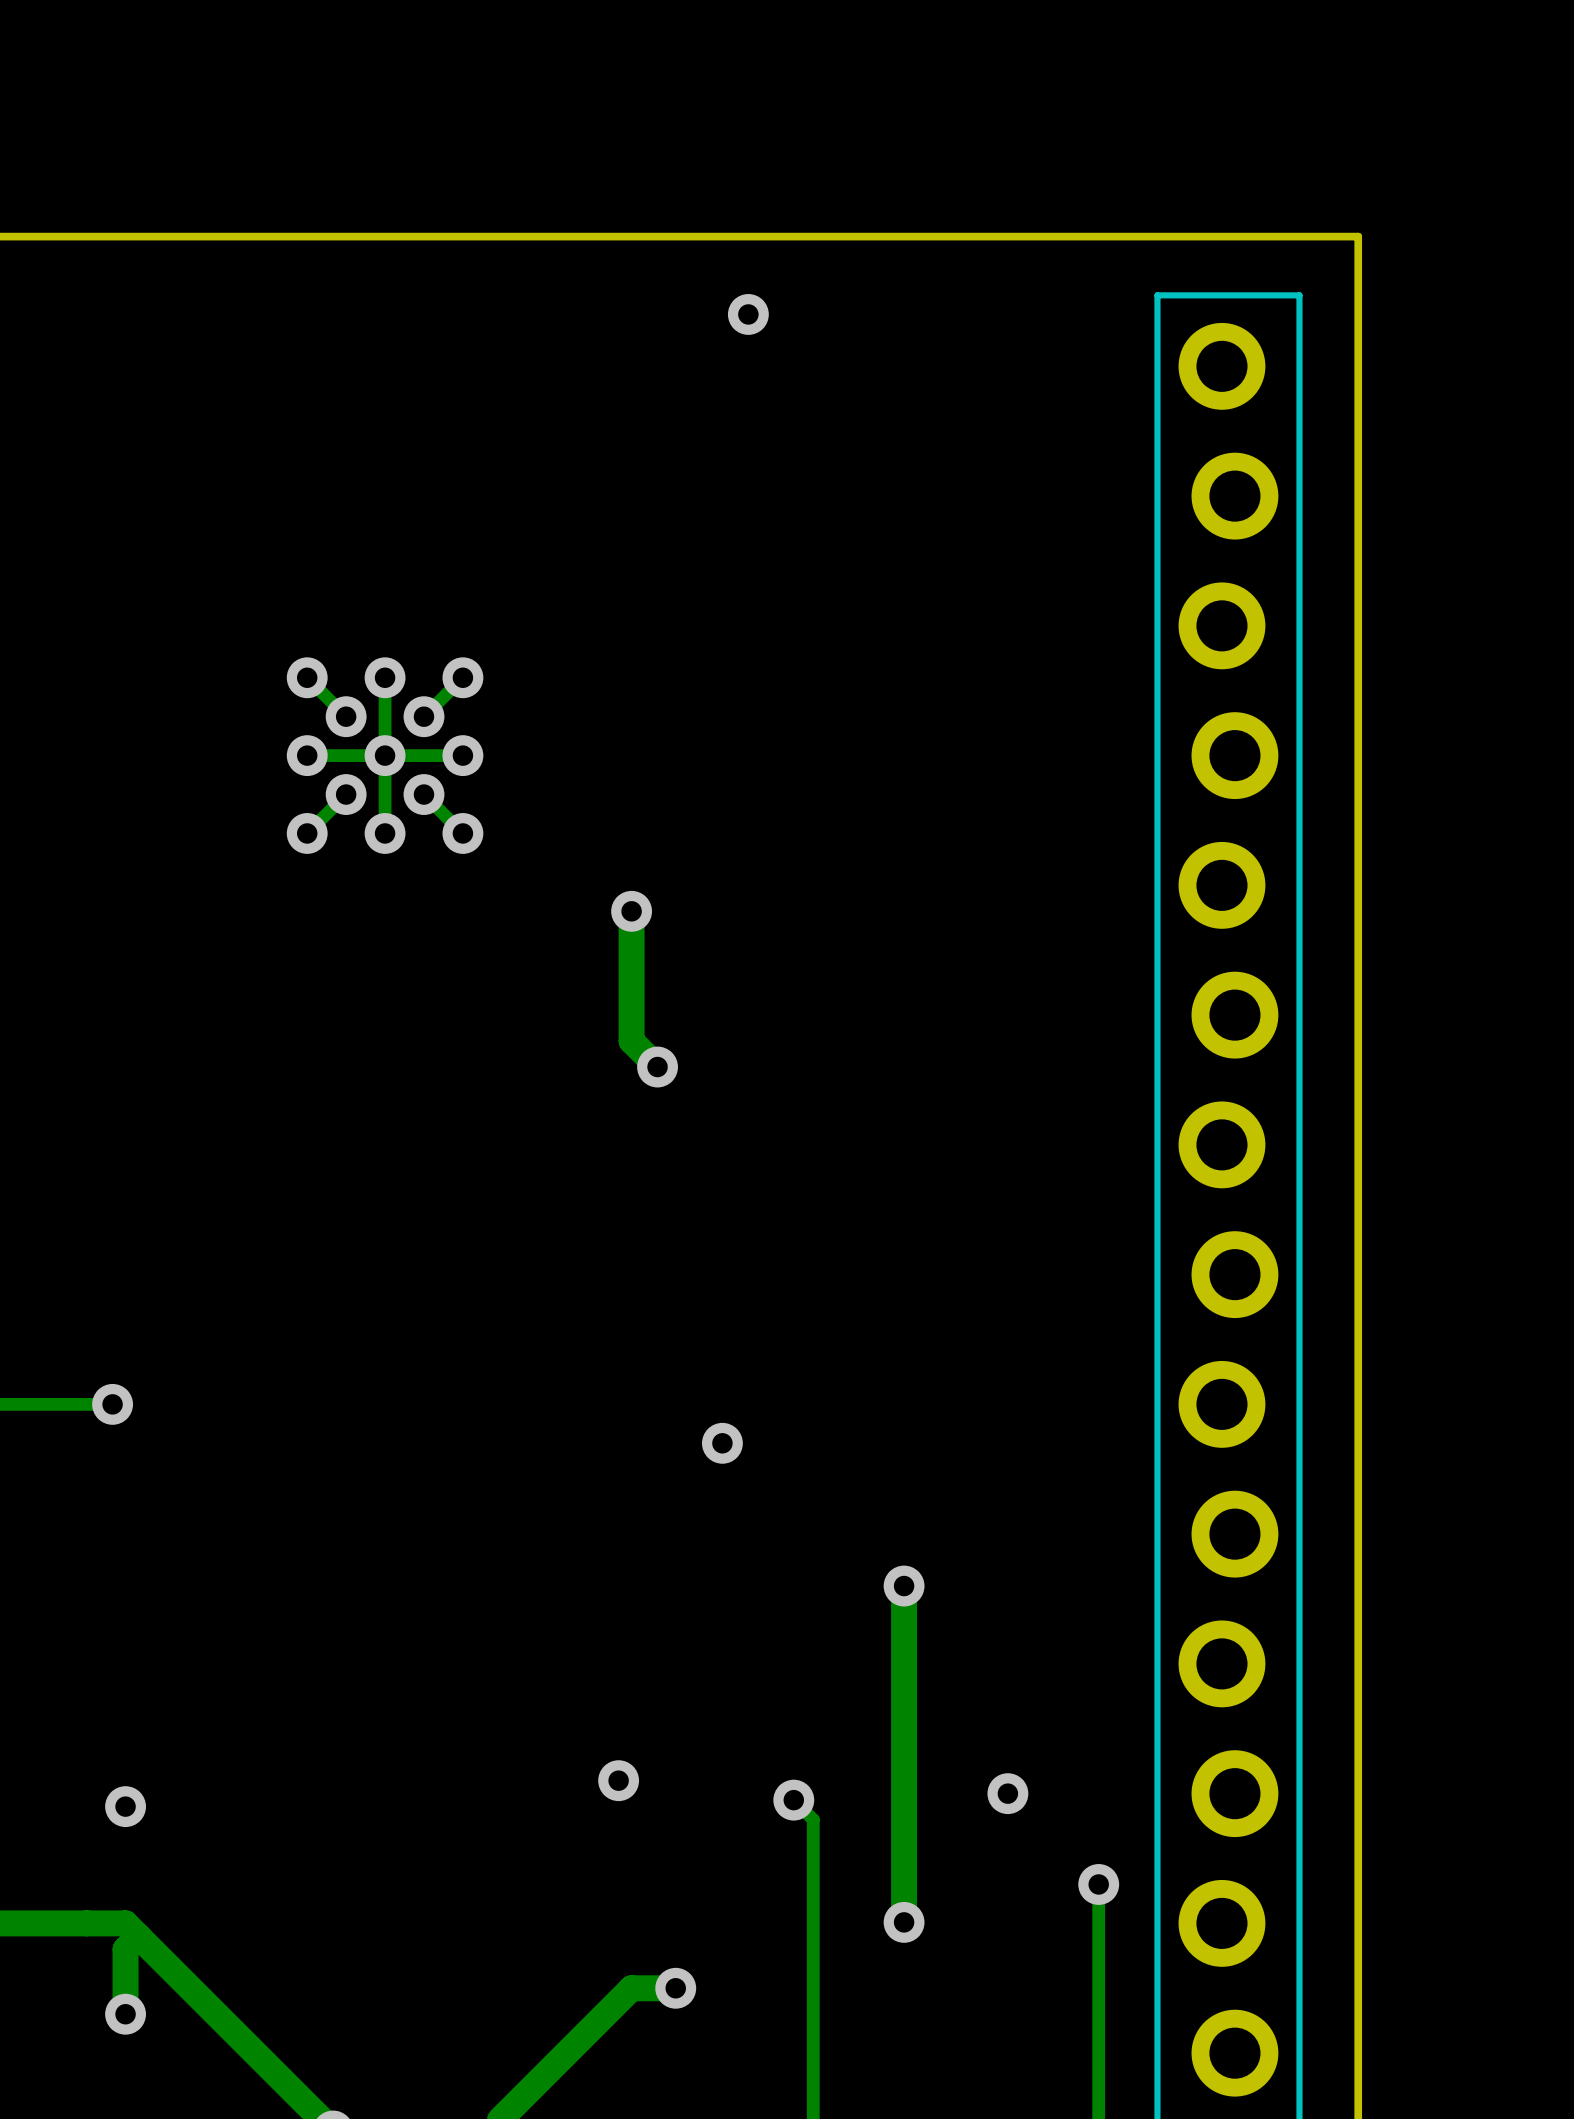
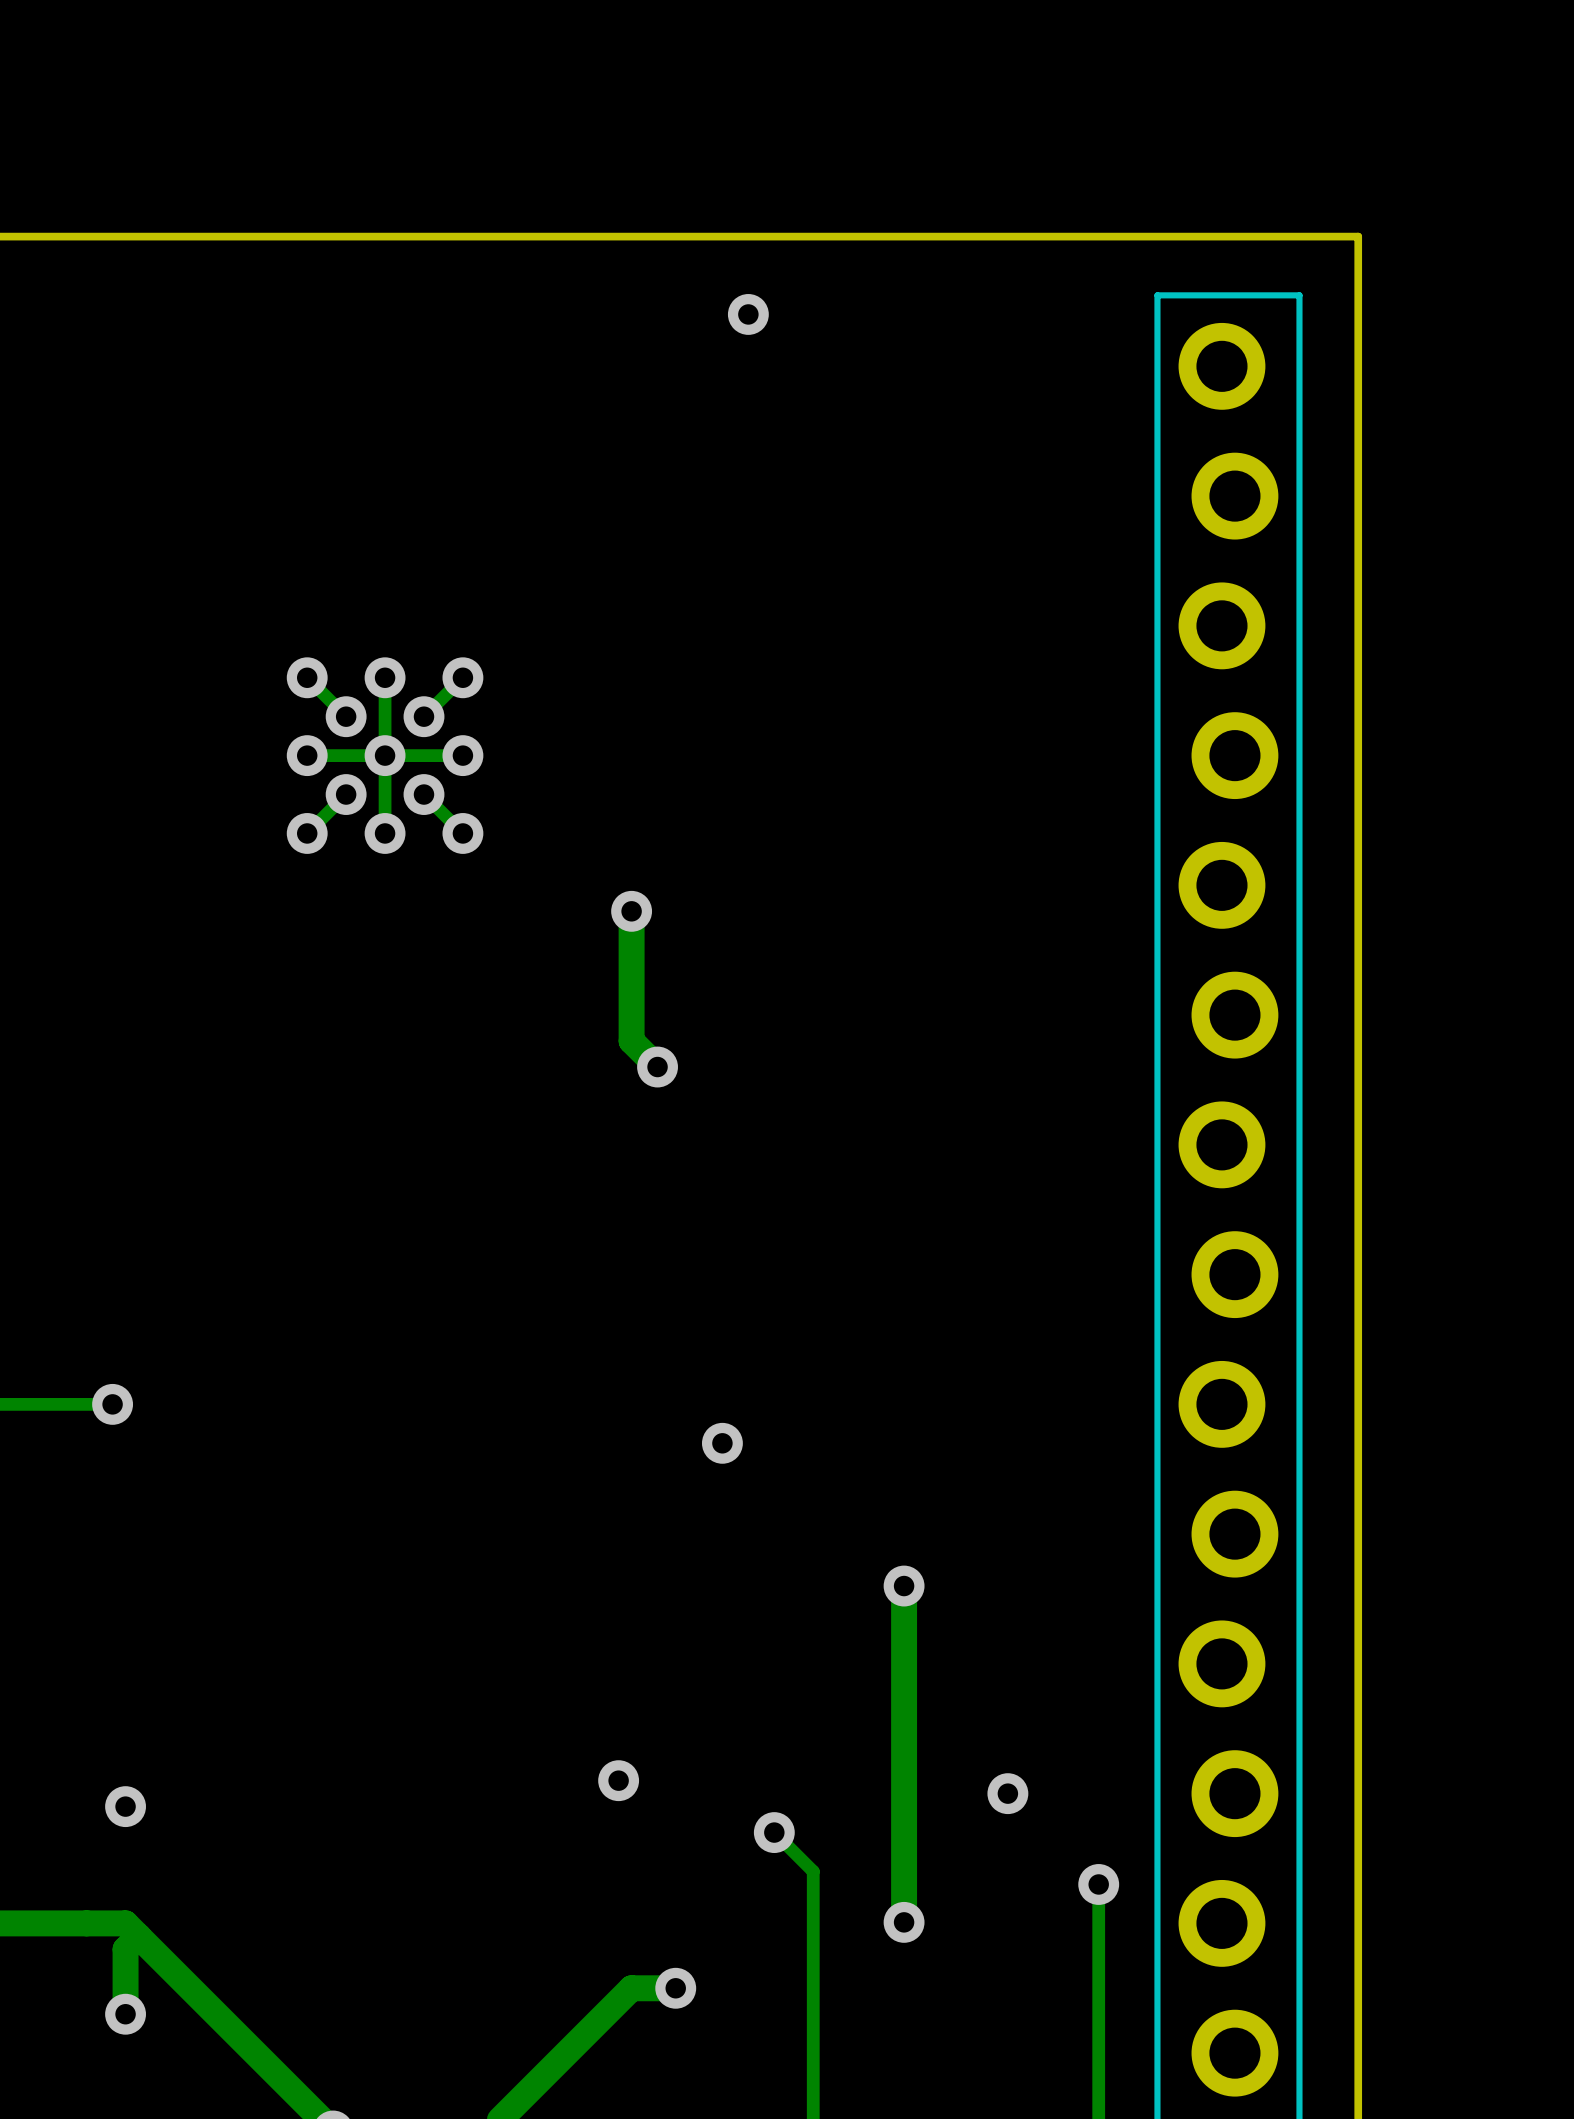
track: (793, 1800) (813, 1819) (813, 1871) -> (774, 1832) (813, 1871)
via position: (793, 1800) -> (774, 1832)

